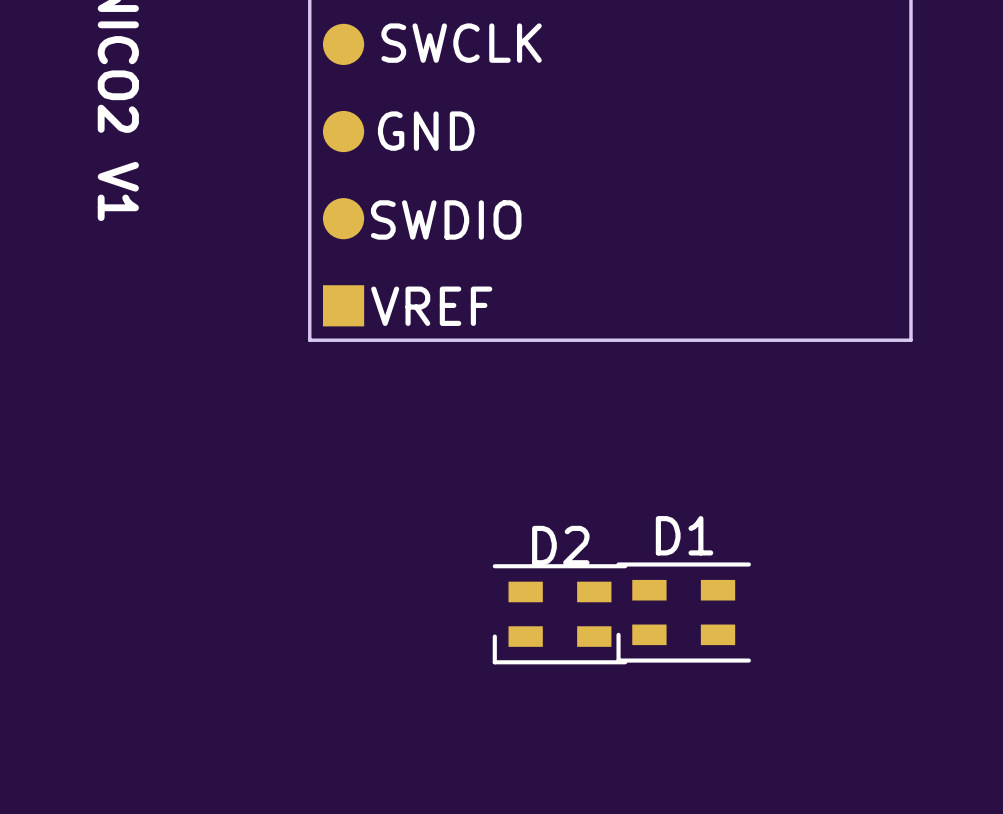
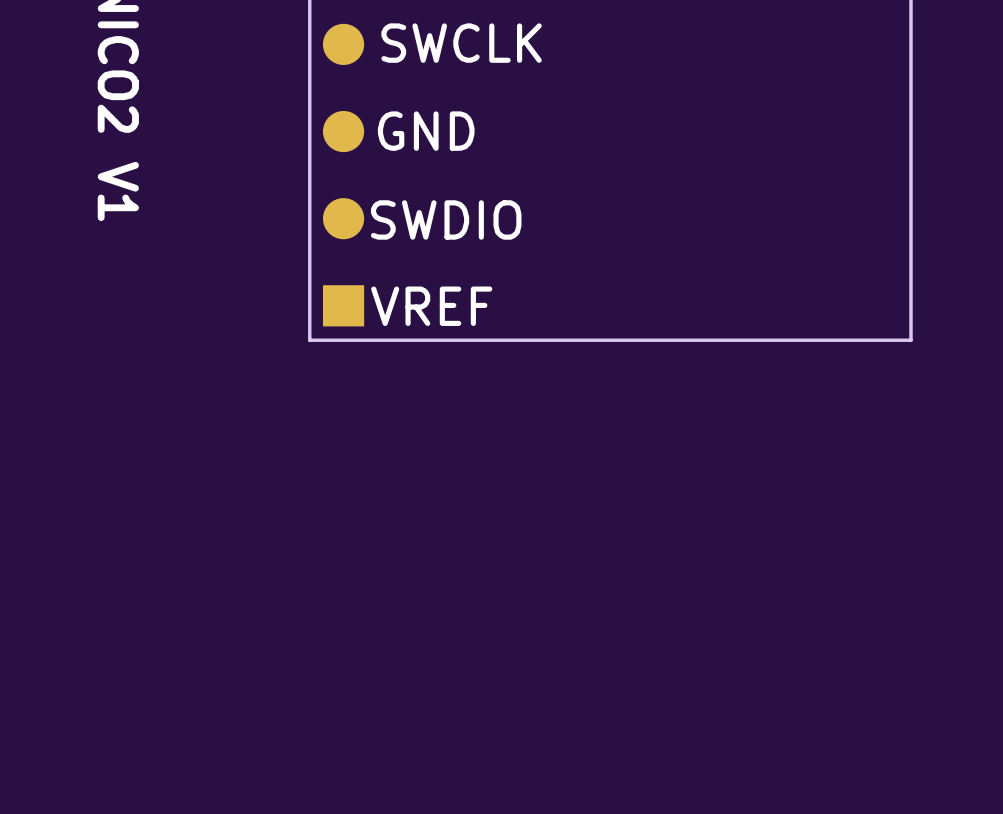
D1: (683, 612) -> none
D2: (559, 614) -> none

